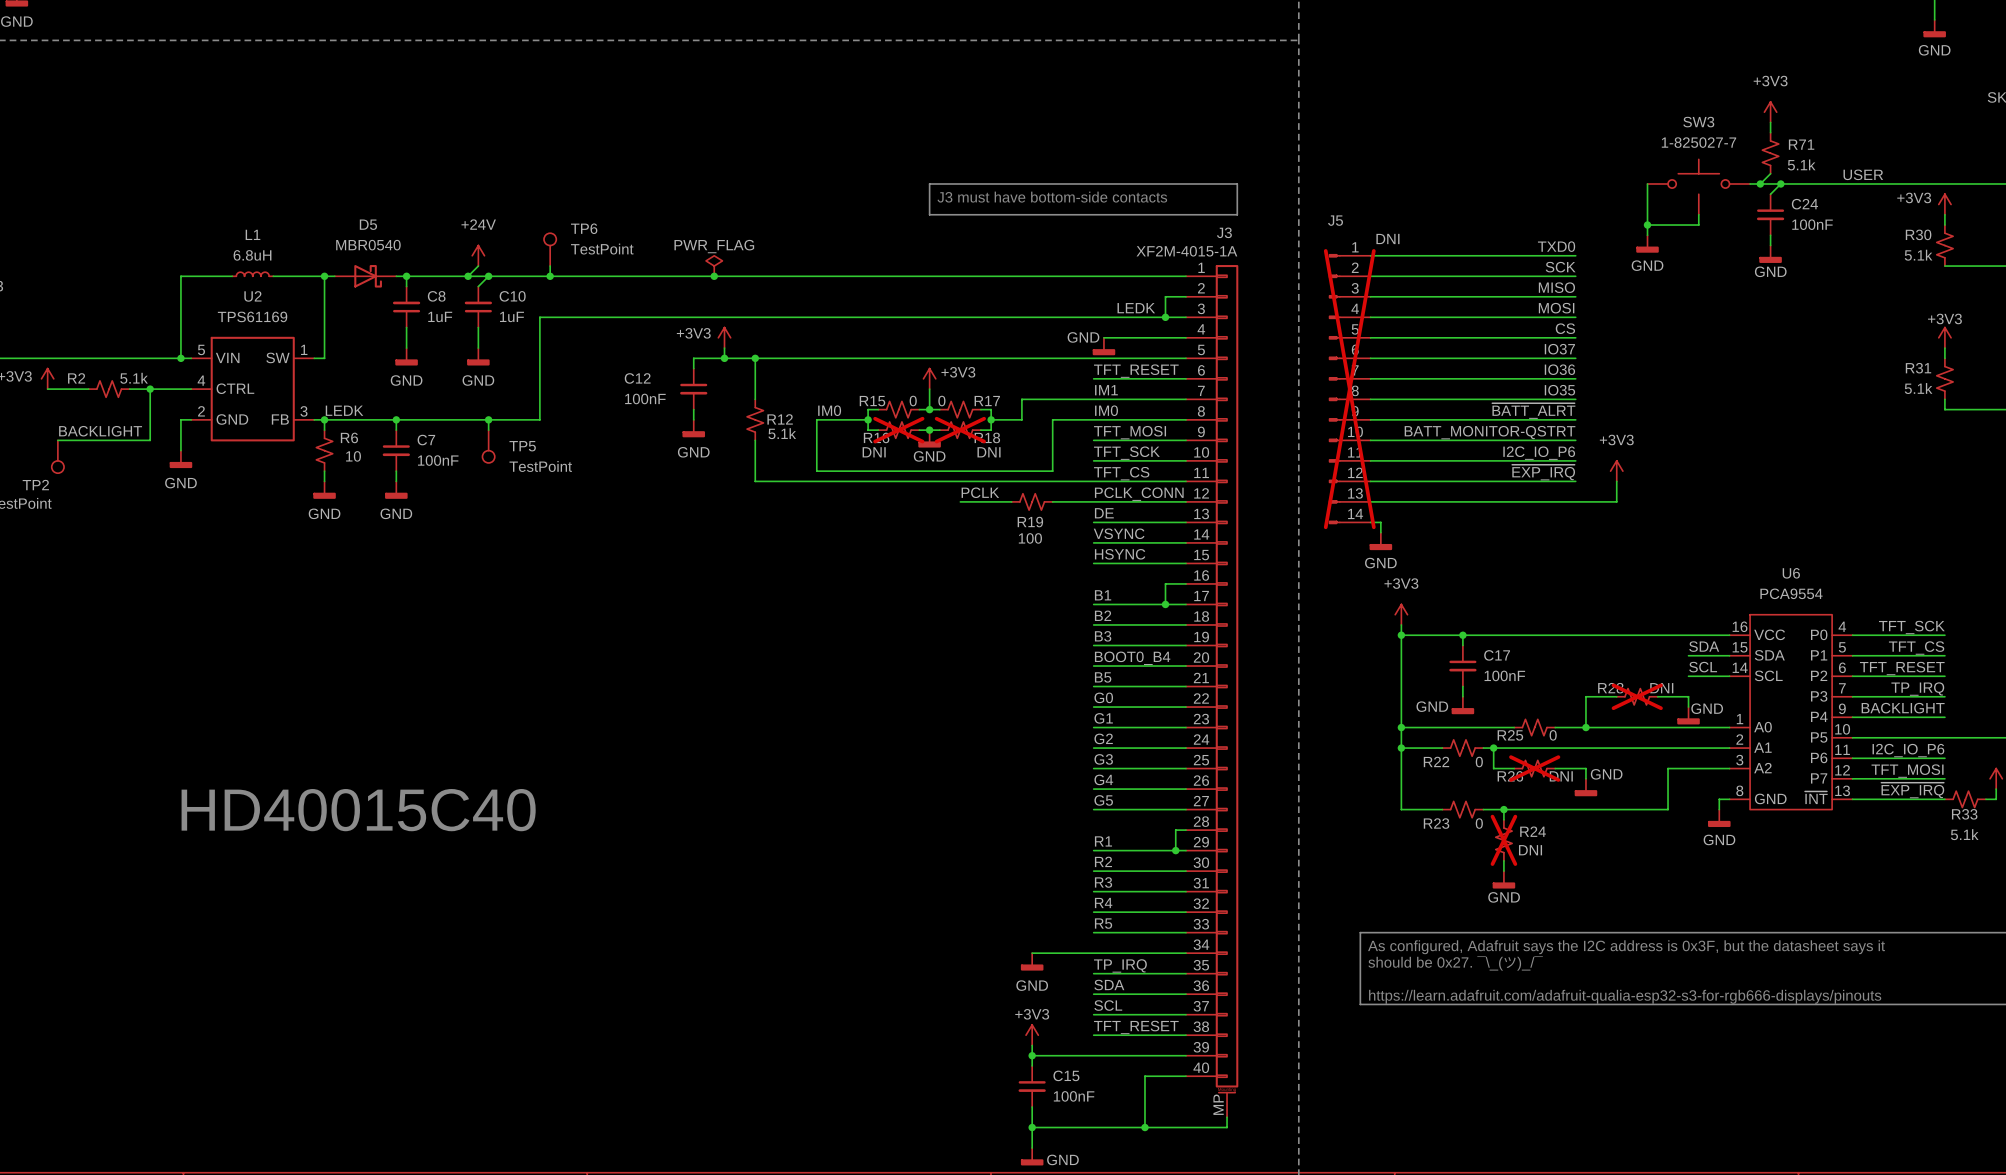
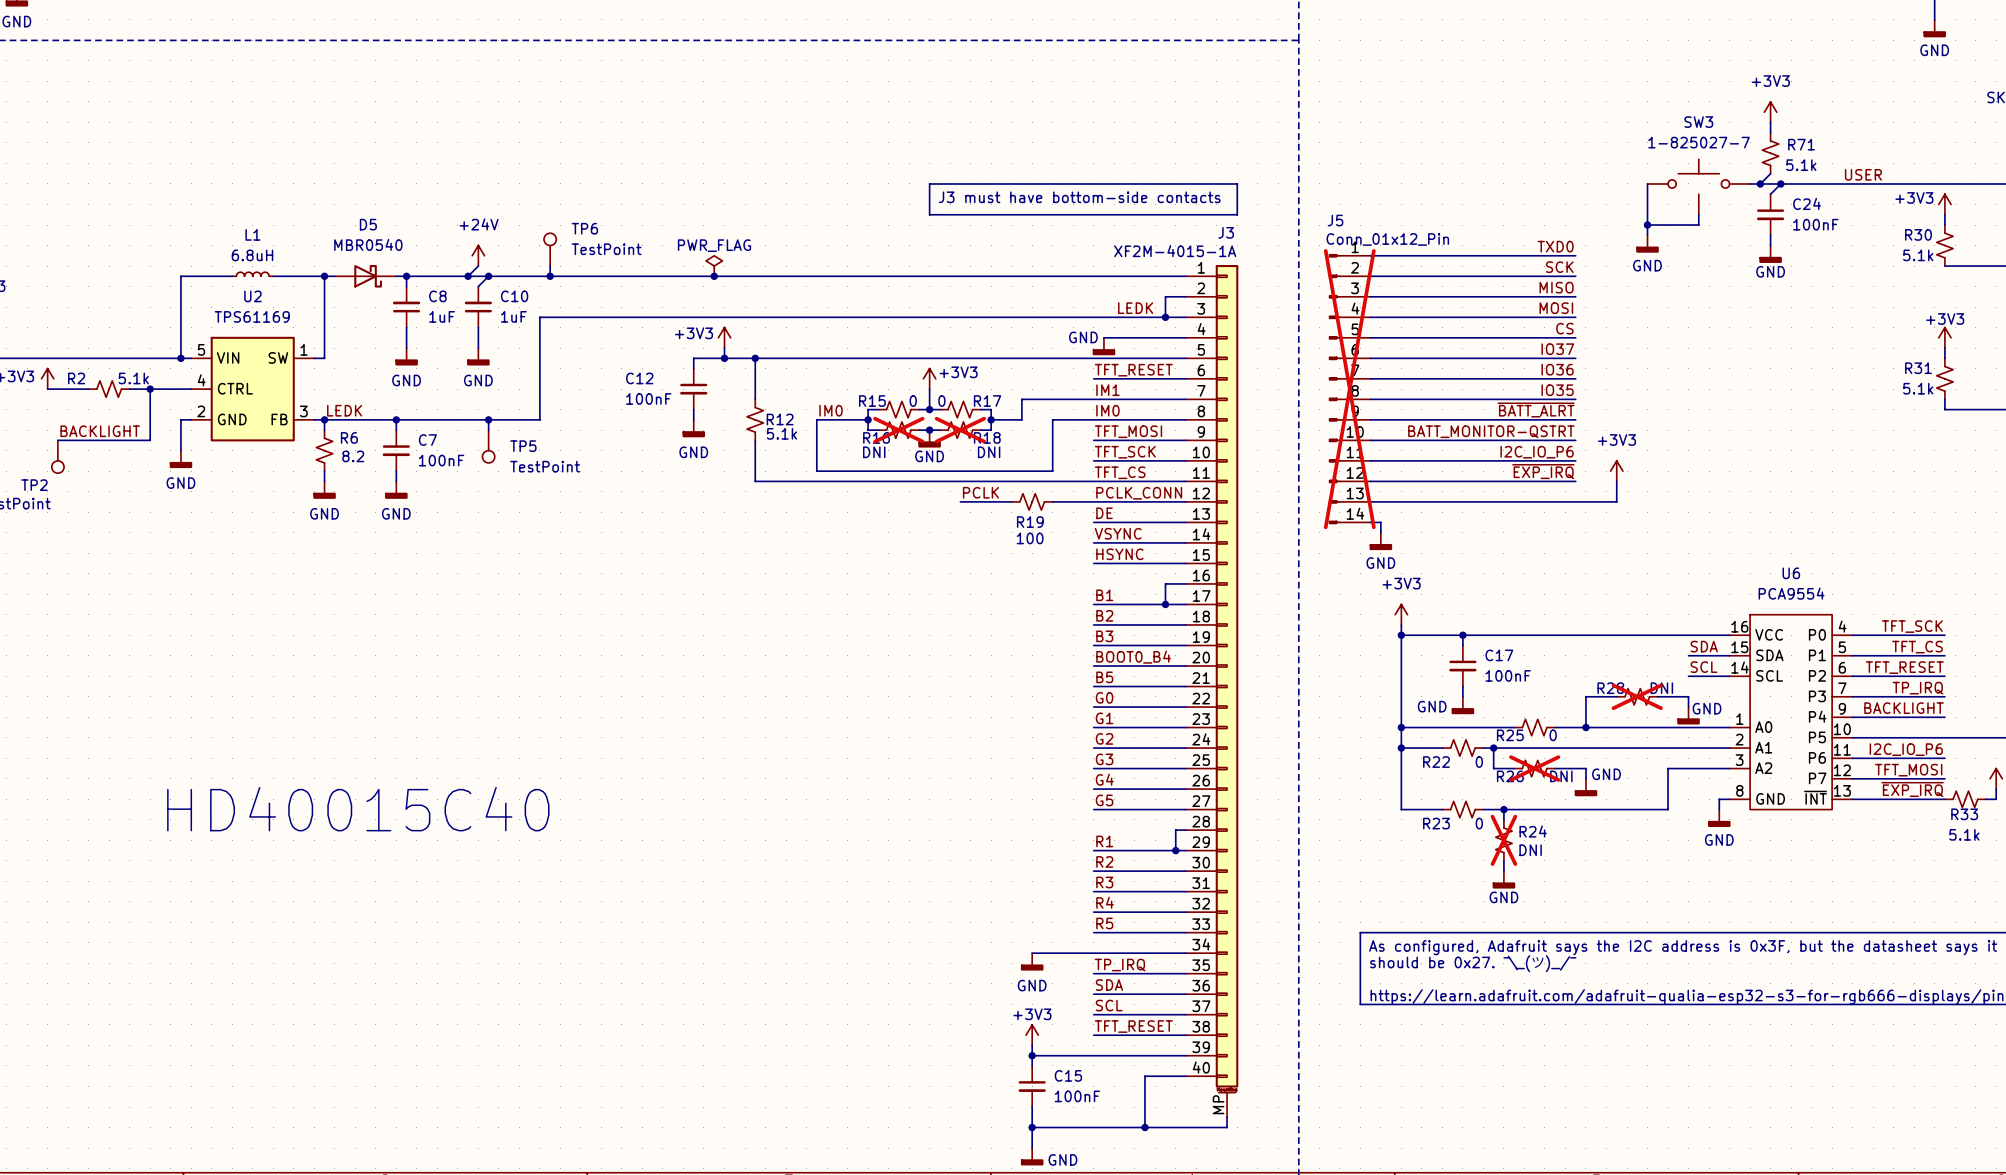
J5 value: DNI (1387, 238) -> Conn_01x12_Pin (1387, 239)
R6 value: 10 (353, 456) -> 8.2 (353, 456)

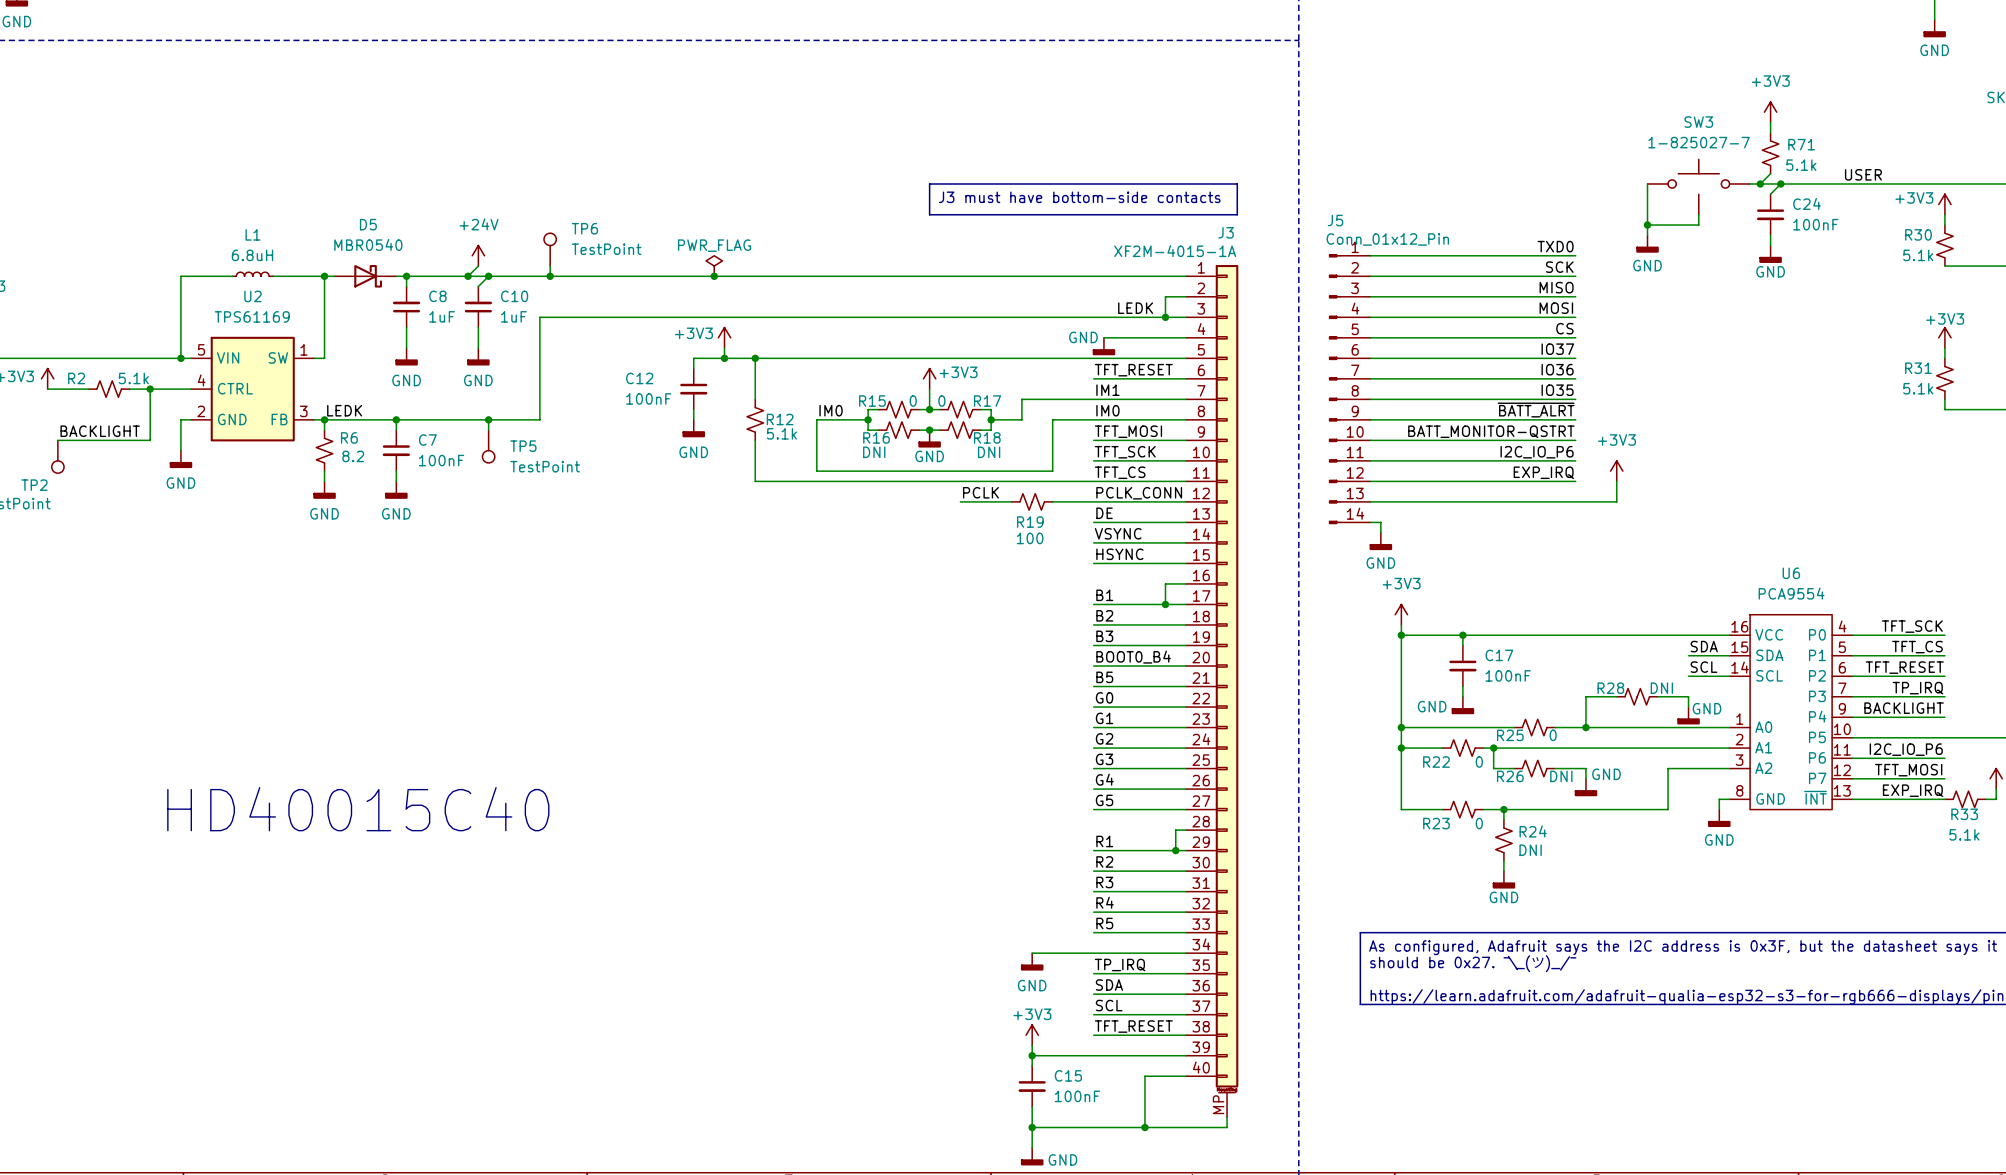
J5 do-not-place cross: (1349, 389) -> none
R16 do-not-place cross: (898, 430) -> none
R18 do-not-place cross: (960, 430) -> none
label: ~{EXP_IRQ} (1543, 471) -> EXP_IRQ (1543, 472)
R28 do-not-place cross: (1637, 696) -> none
R26 do-not-place cross: (1534, 768) -> none
label: ~{EXP_IRQ} (1912, 789) -> EXP_IRQ (1913, 790)
R24 do-not-place cross: (1503, 840) -> none

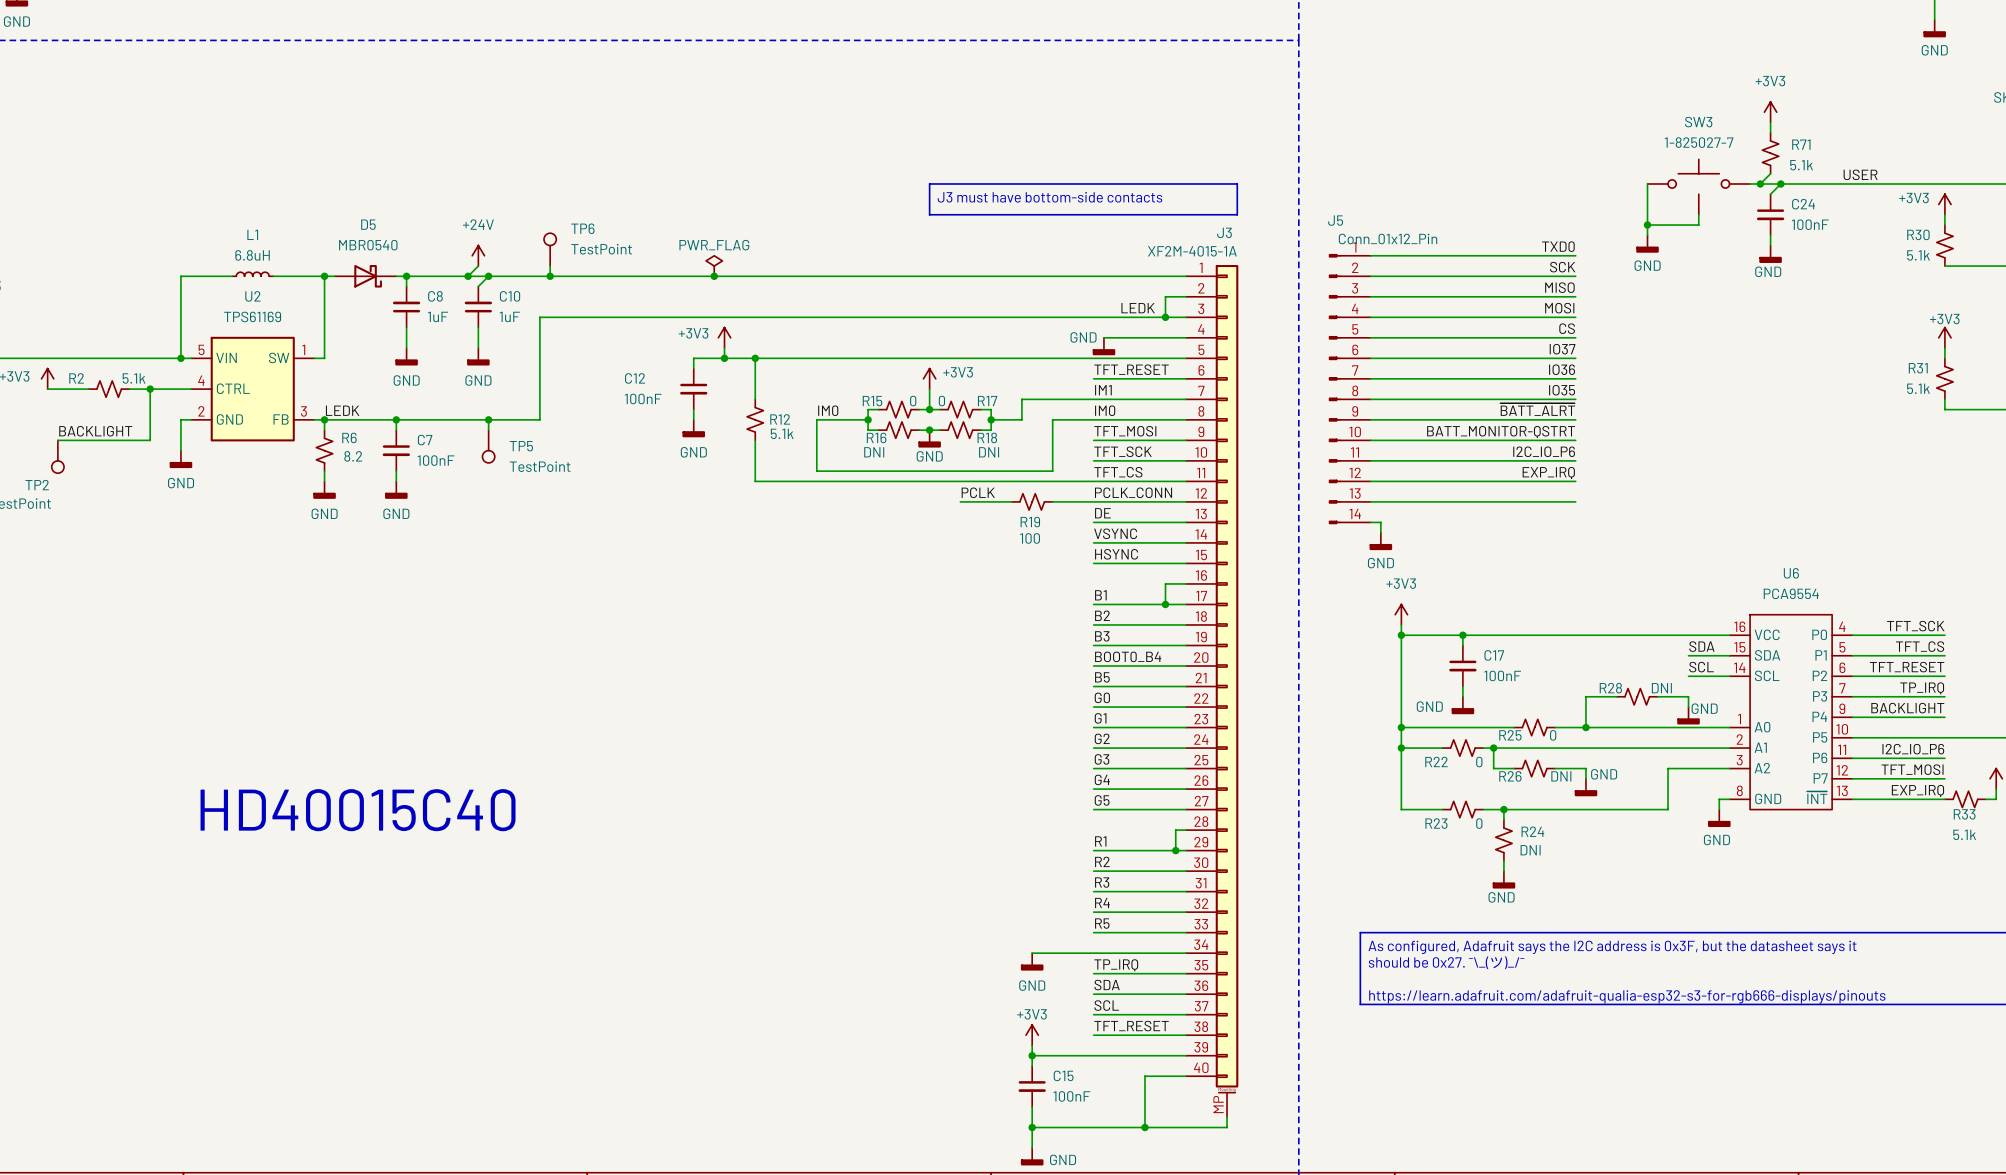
power symbol: +3V3 (1616, 471) -> none
wire: (1616, 481) (1616, 501) (1575, 501) -> none

